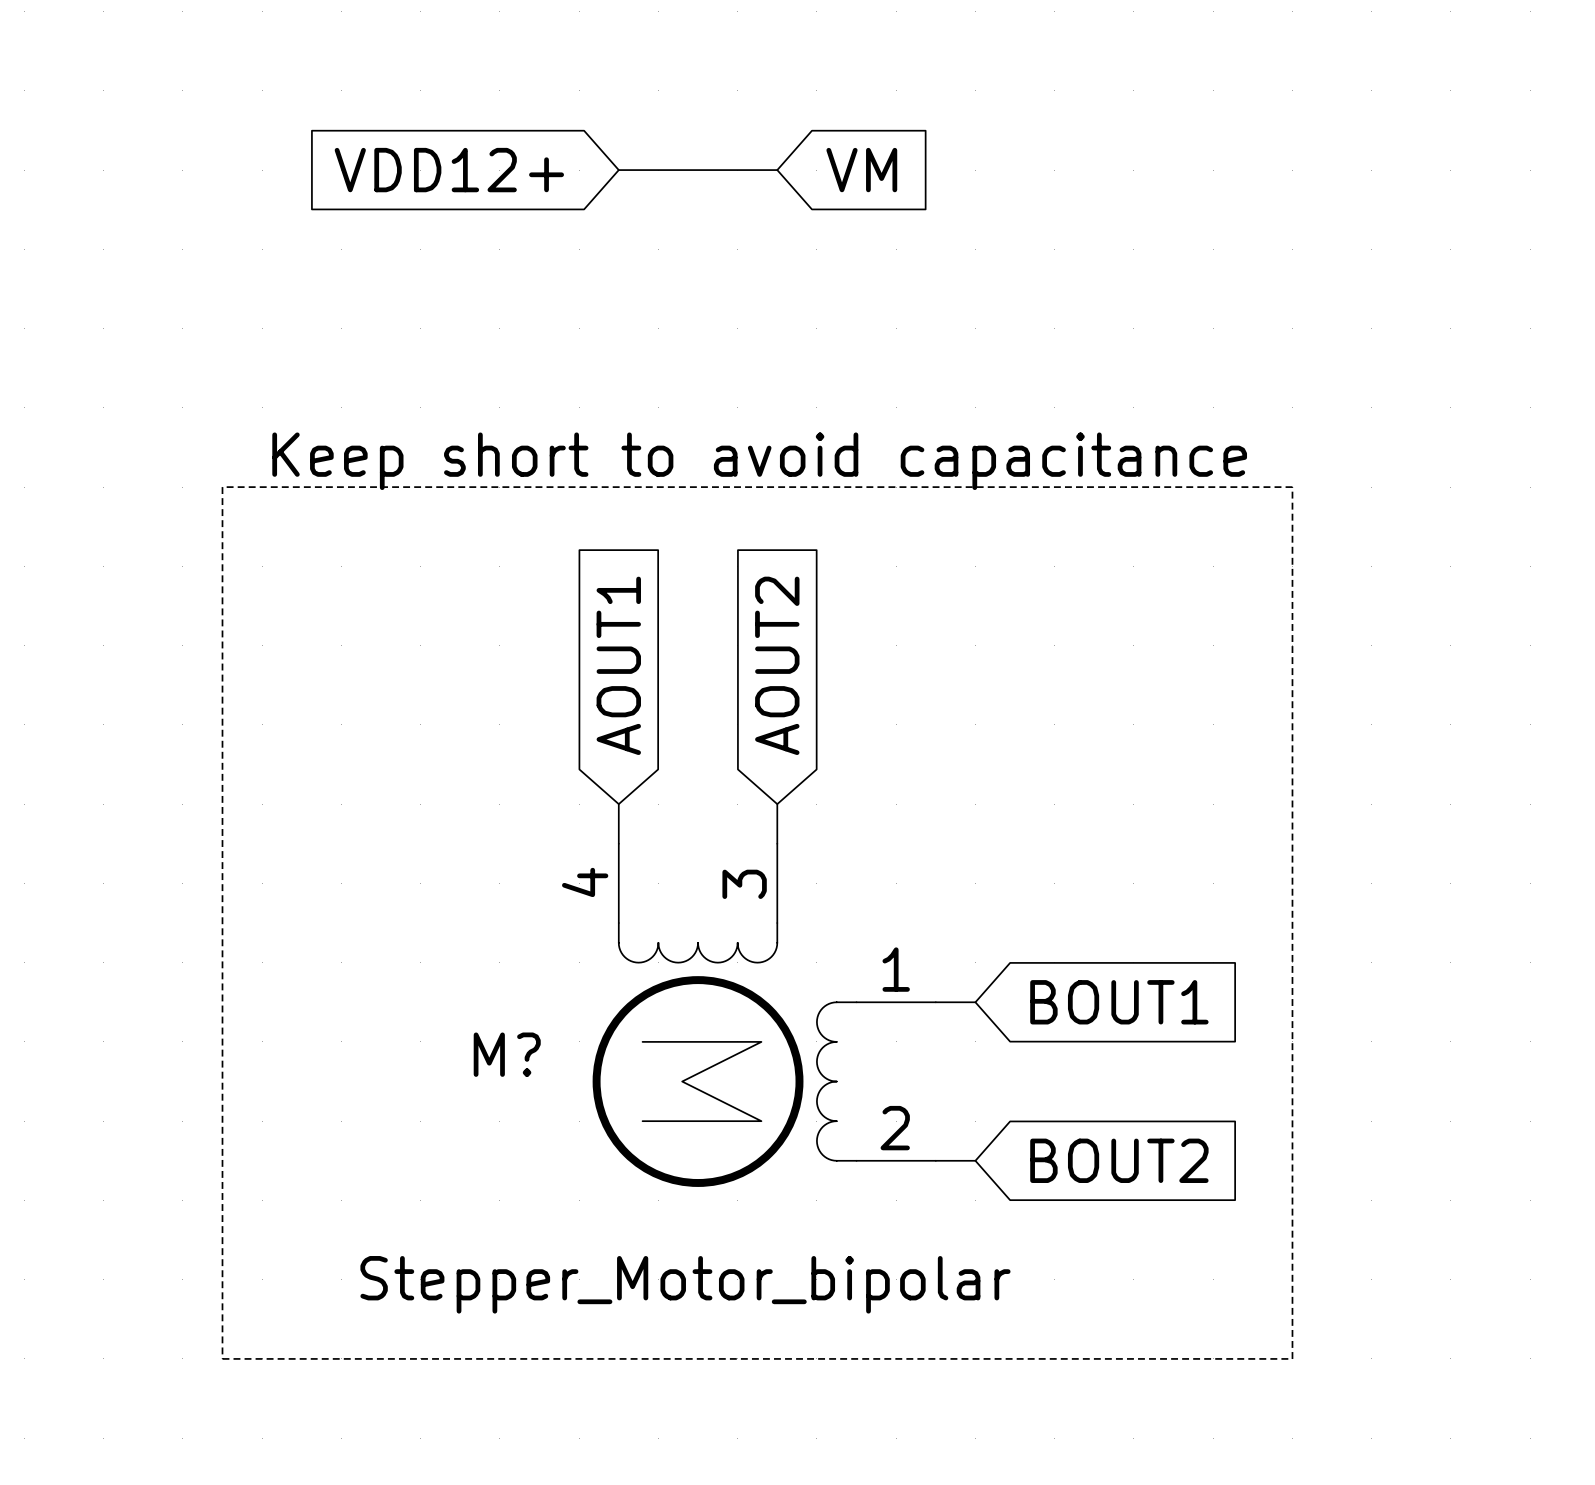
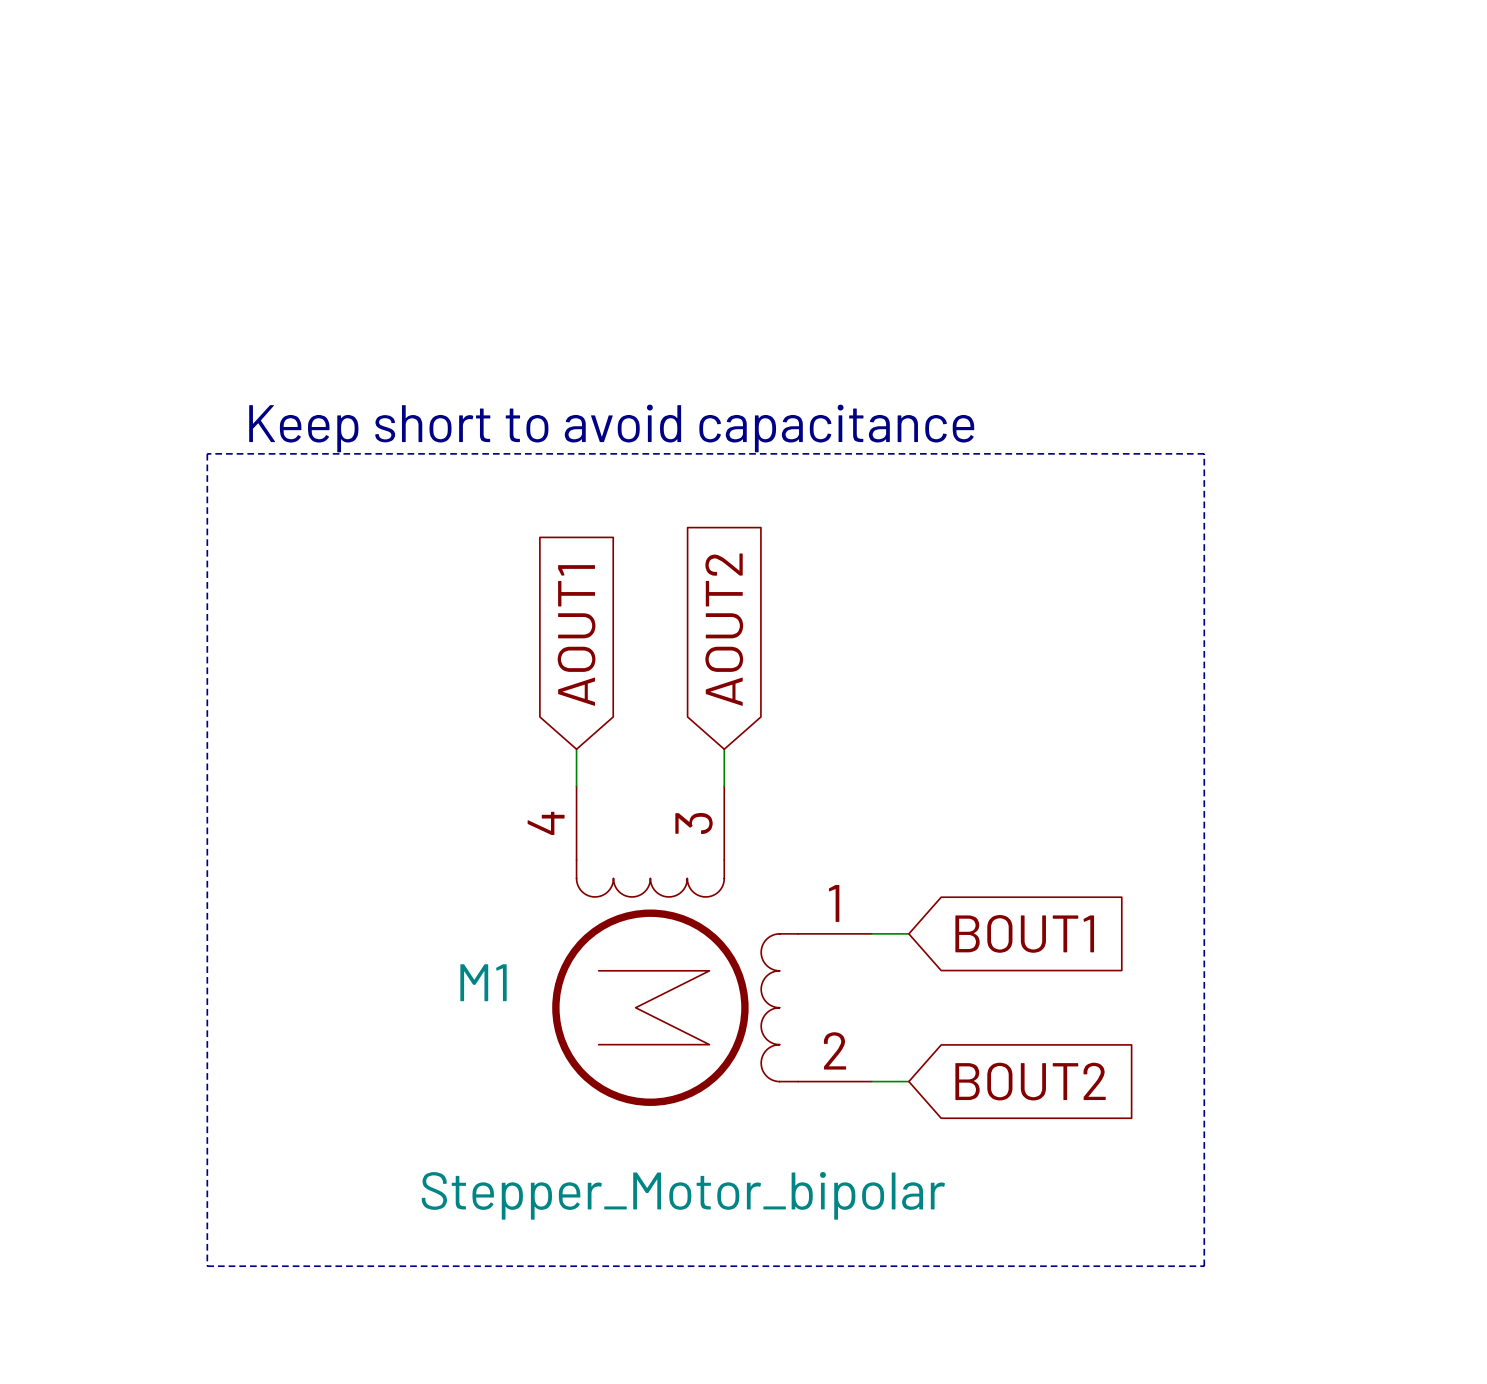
global label: VDD12+ (449, 170) -> none
wire: (618, 170) (777, 170) -> none
global label: VM (861, 170) -> none
M? name: M? (507, 1054) -> M1 (483, 982)

